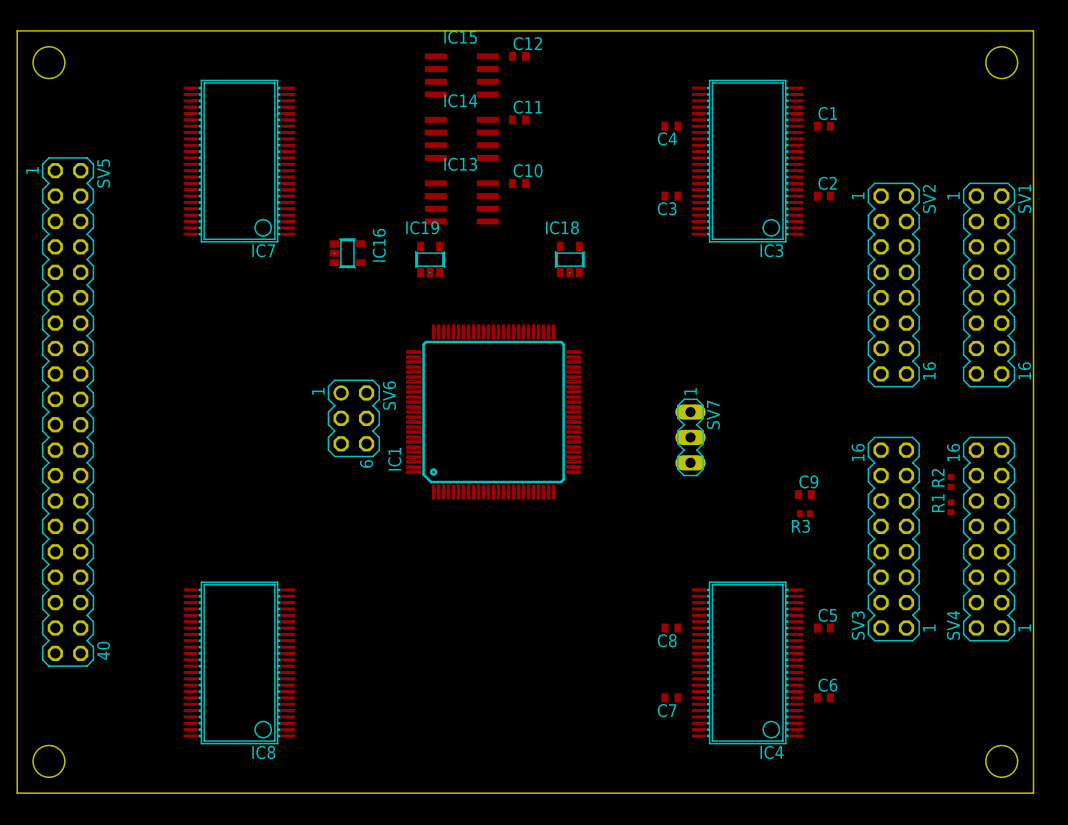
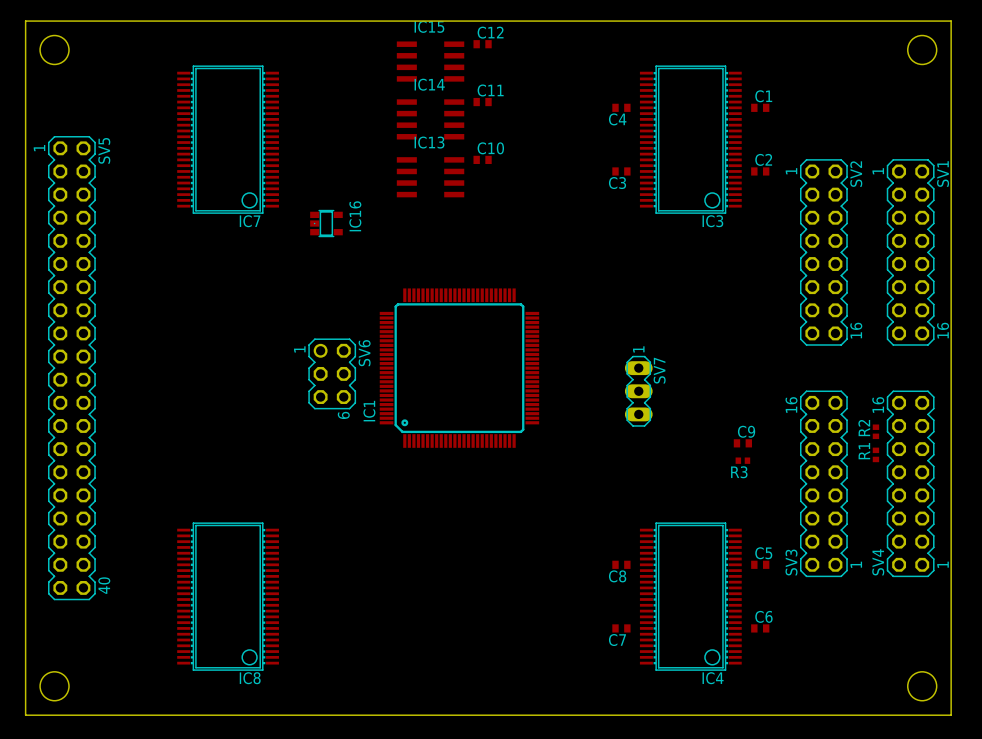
IC19: (430, 259) -> none
IC18: (569, 259) -> none

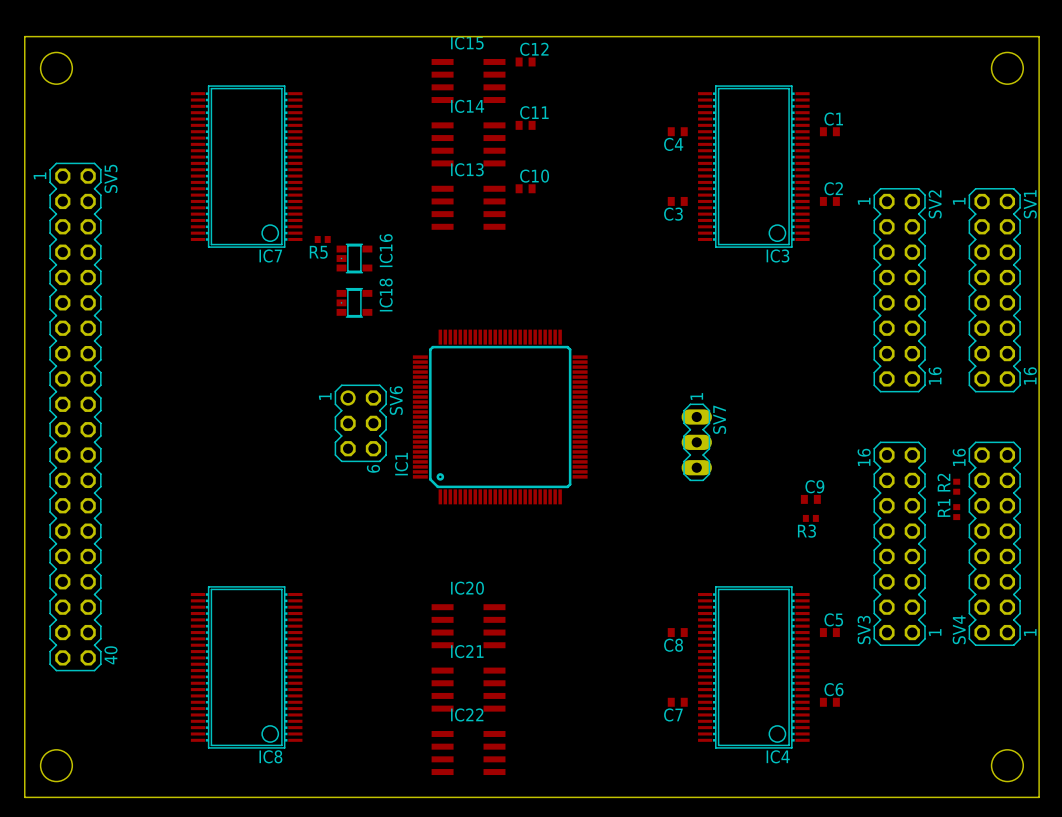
R5: none -> (322, 239)
IC18: none -> (354, 302)
IC20: none -> (468, 626)
IC21: none -> (468, 689)
IC22: none -> (468, 753)

